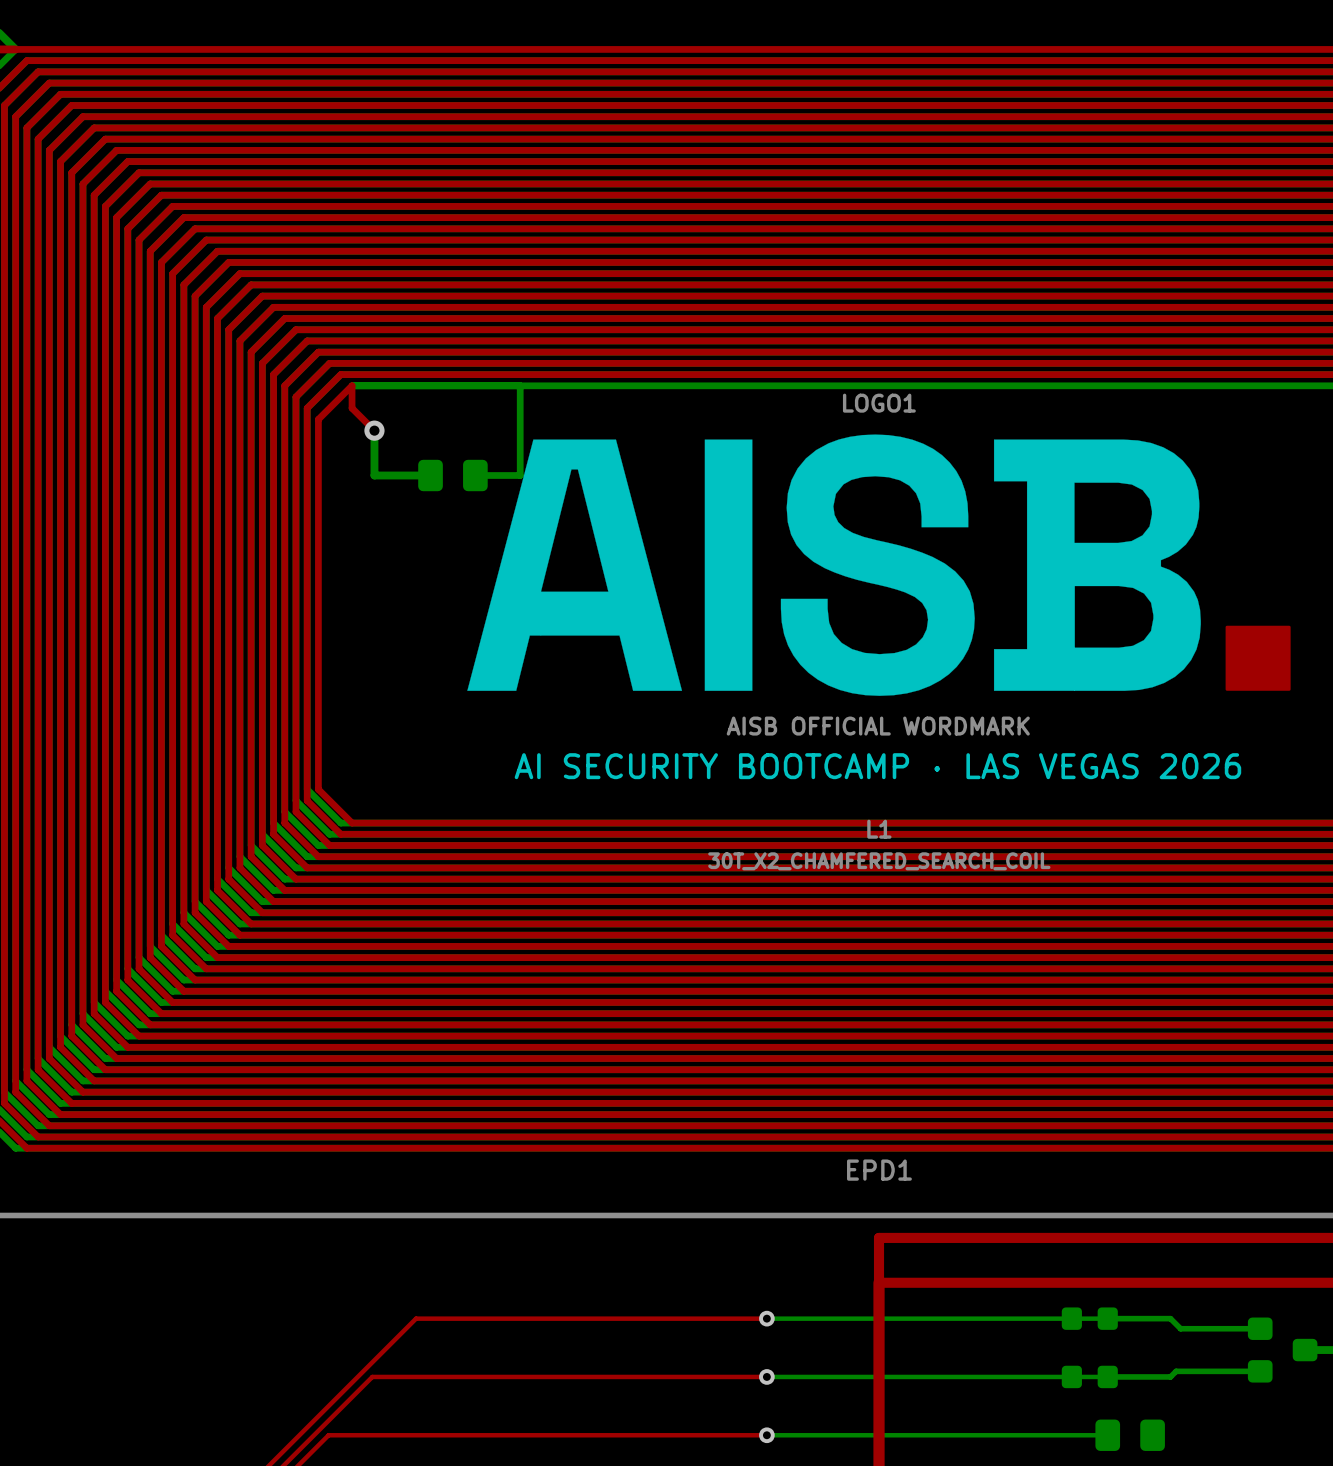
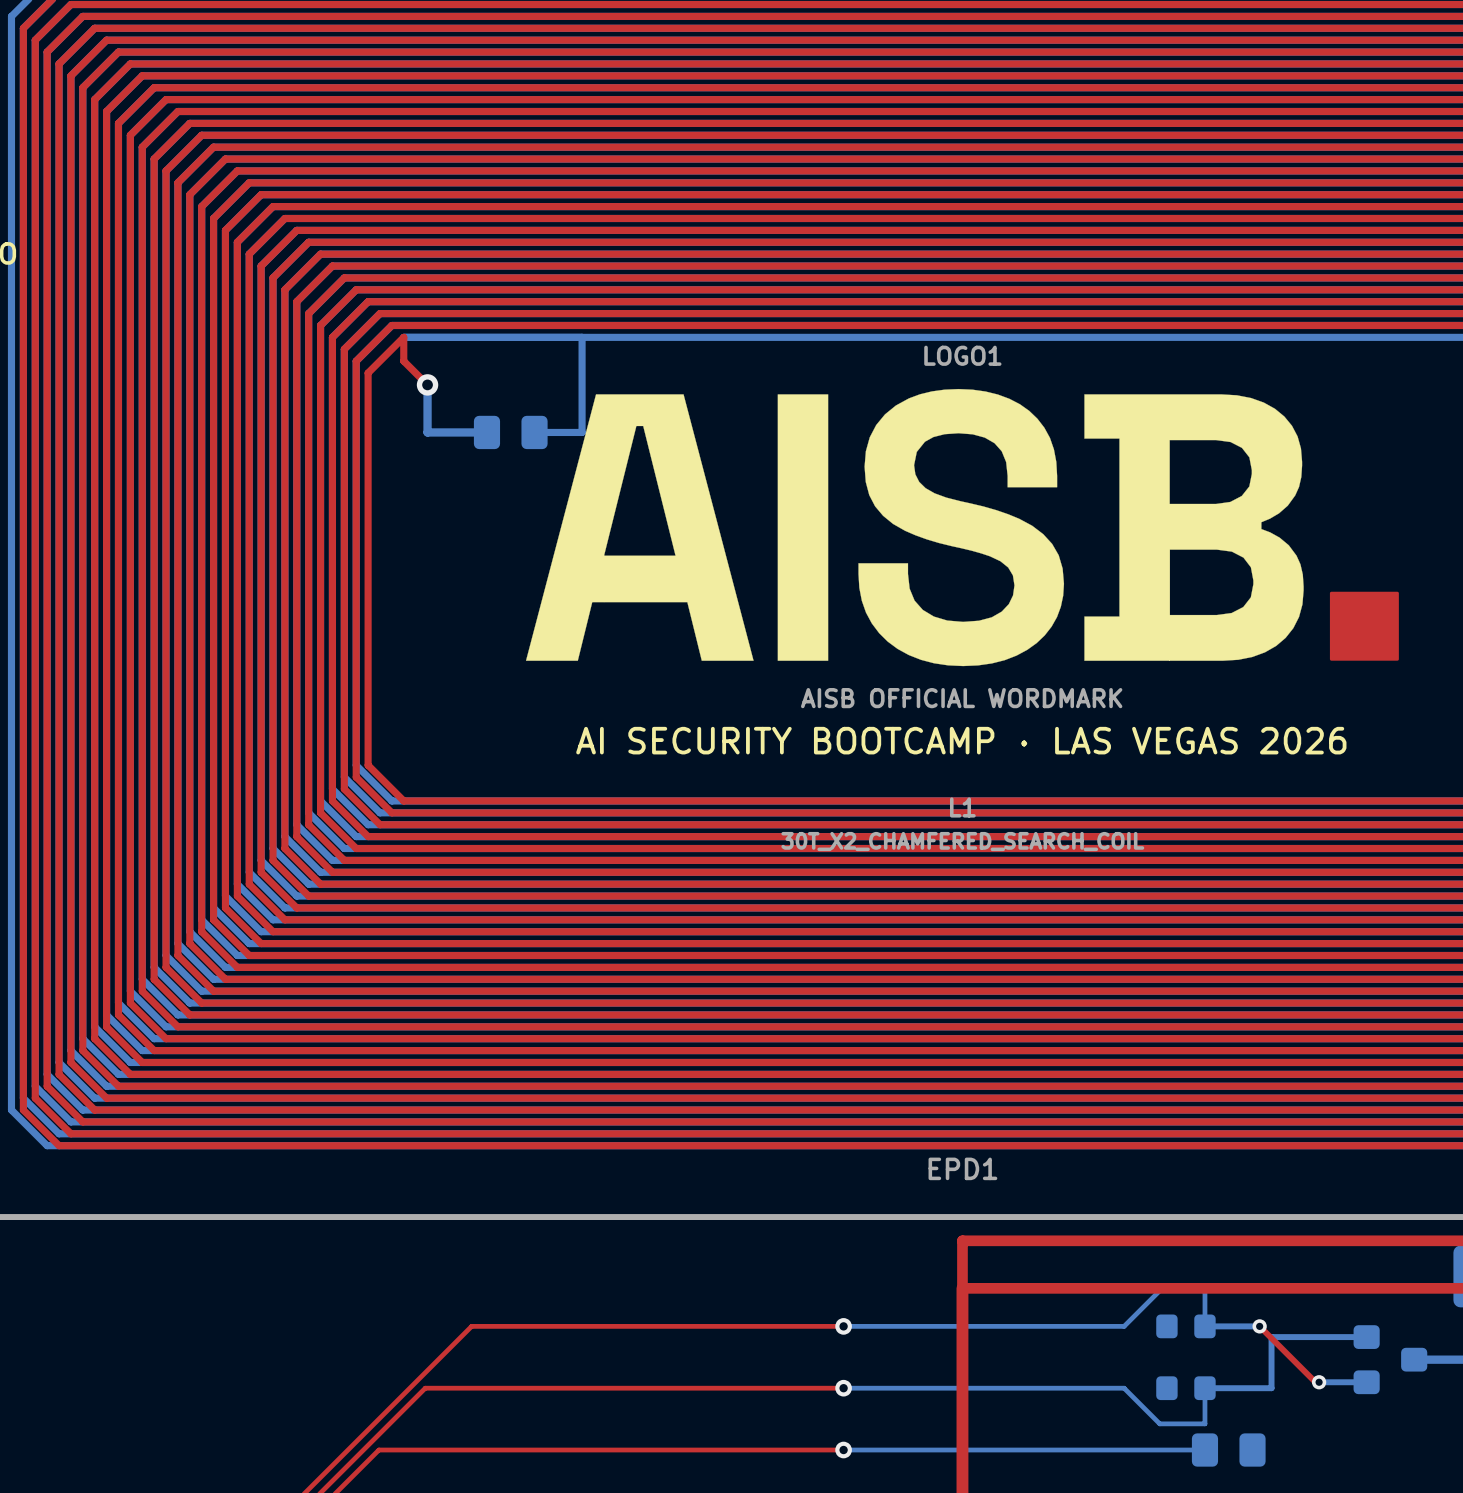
bottom track: (1031, 1318) (1107, 1318) -> (1124, 1326) (1159, 1290) (1204, 1290) (1204, 1326)
top track: none -> (1259, 1326) (1315, 1382) (1319, 1382)
bottom track: (1159, 1318) (1170, 1318) (1180, 1328) -> none
via: none -> (1259, 1326)
bottom track: (1215, 1371) (1176, 1371) (1170, 1376) -> (1282, 1337) (1271, 1337) (1271, 1388)
via: none -> (1319, 1382)
bottom track: (1031, 1376) (1107, 1376) -> (1124, 1388) (1159, 1423) (1204, 1423) (1204, 1388)

